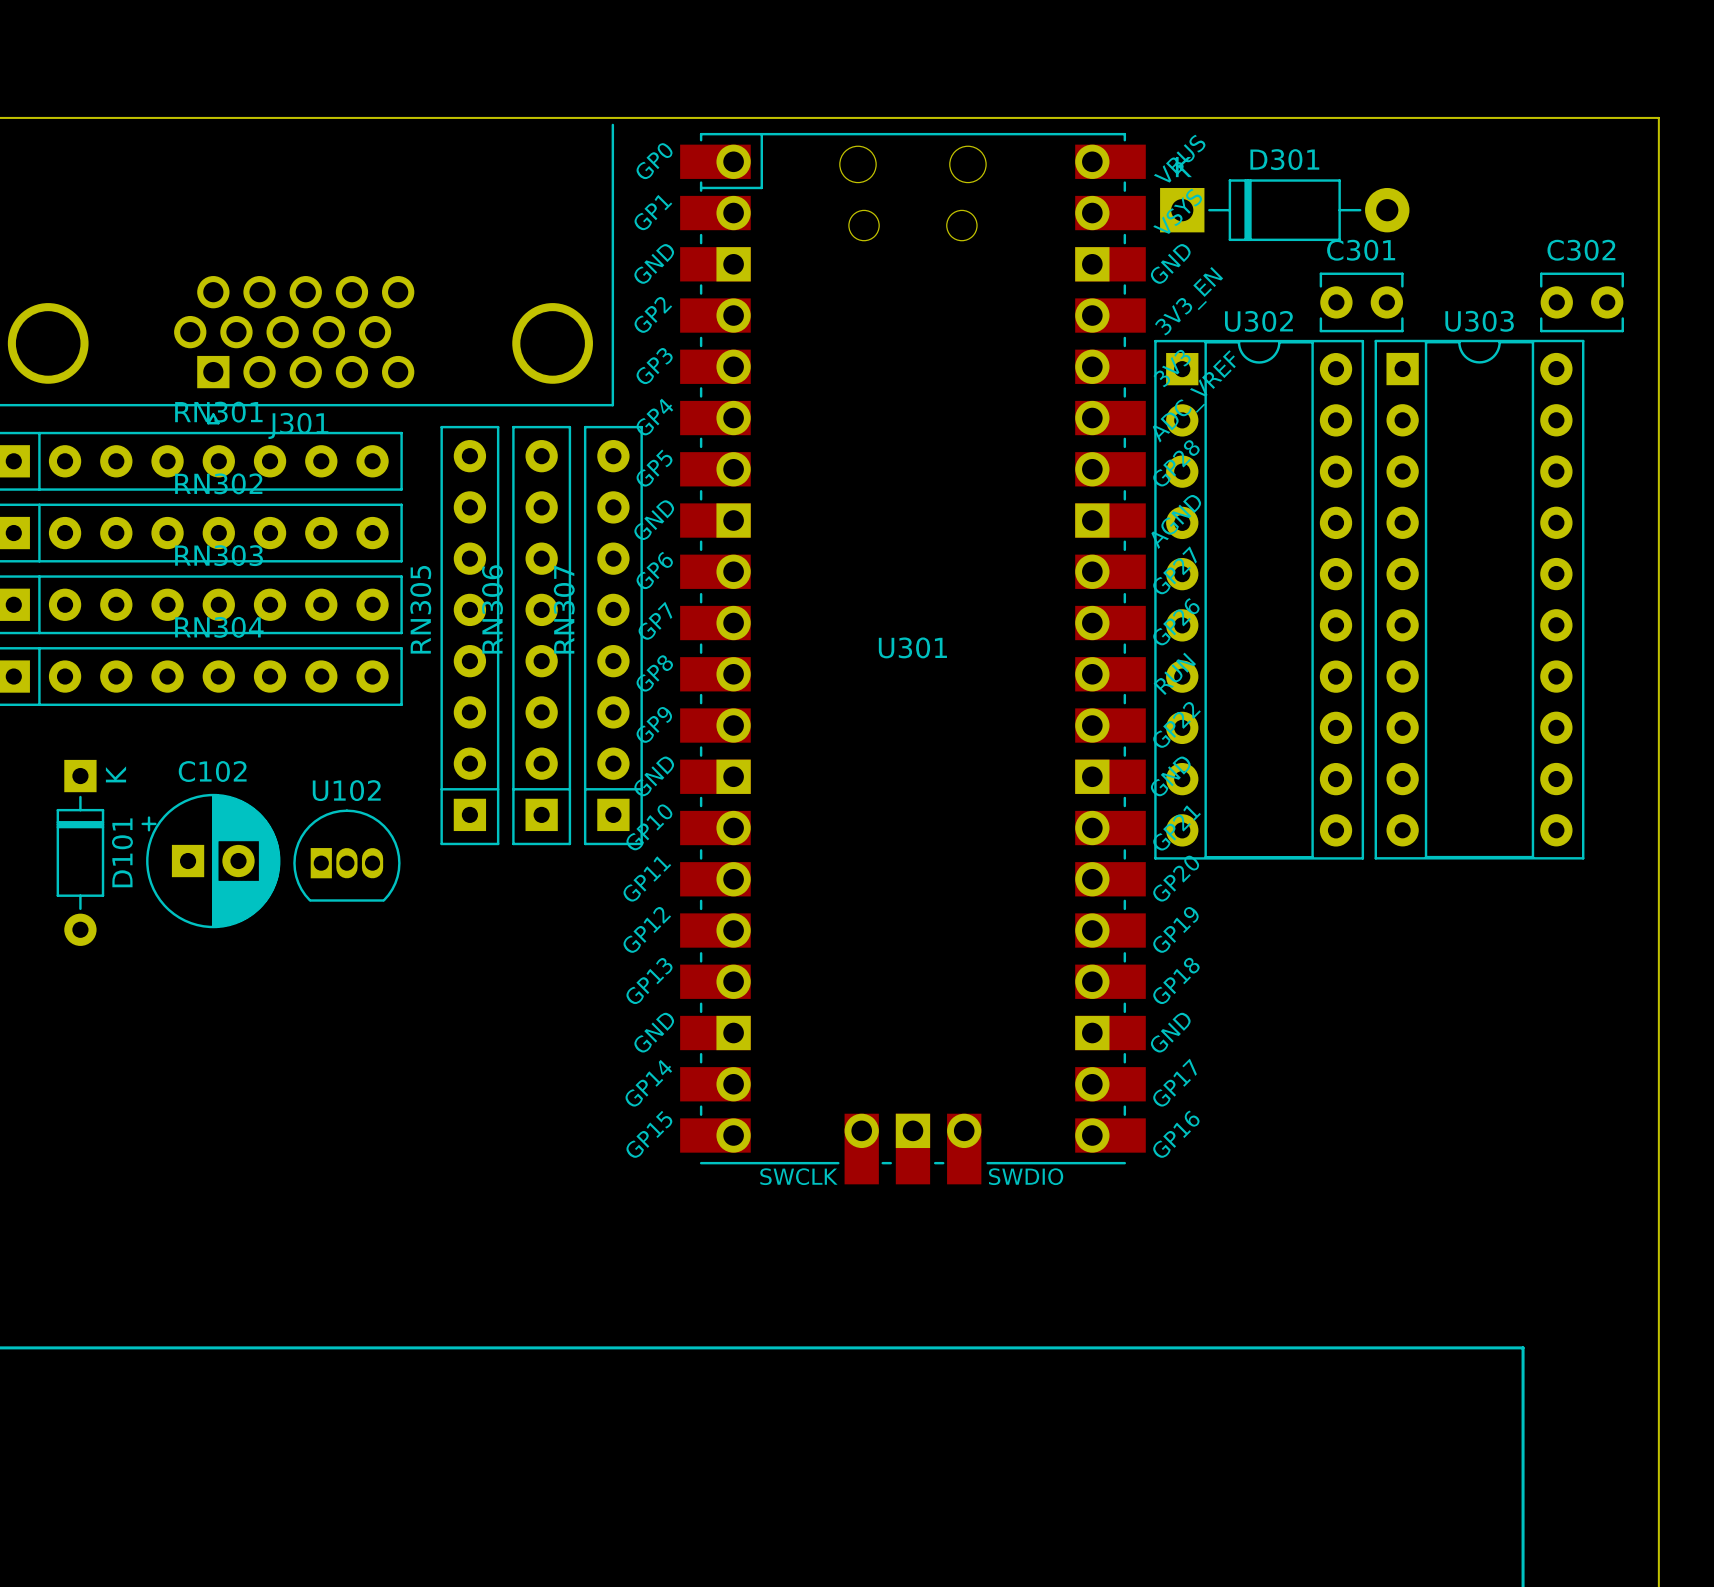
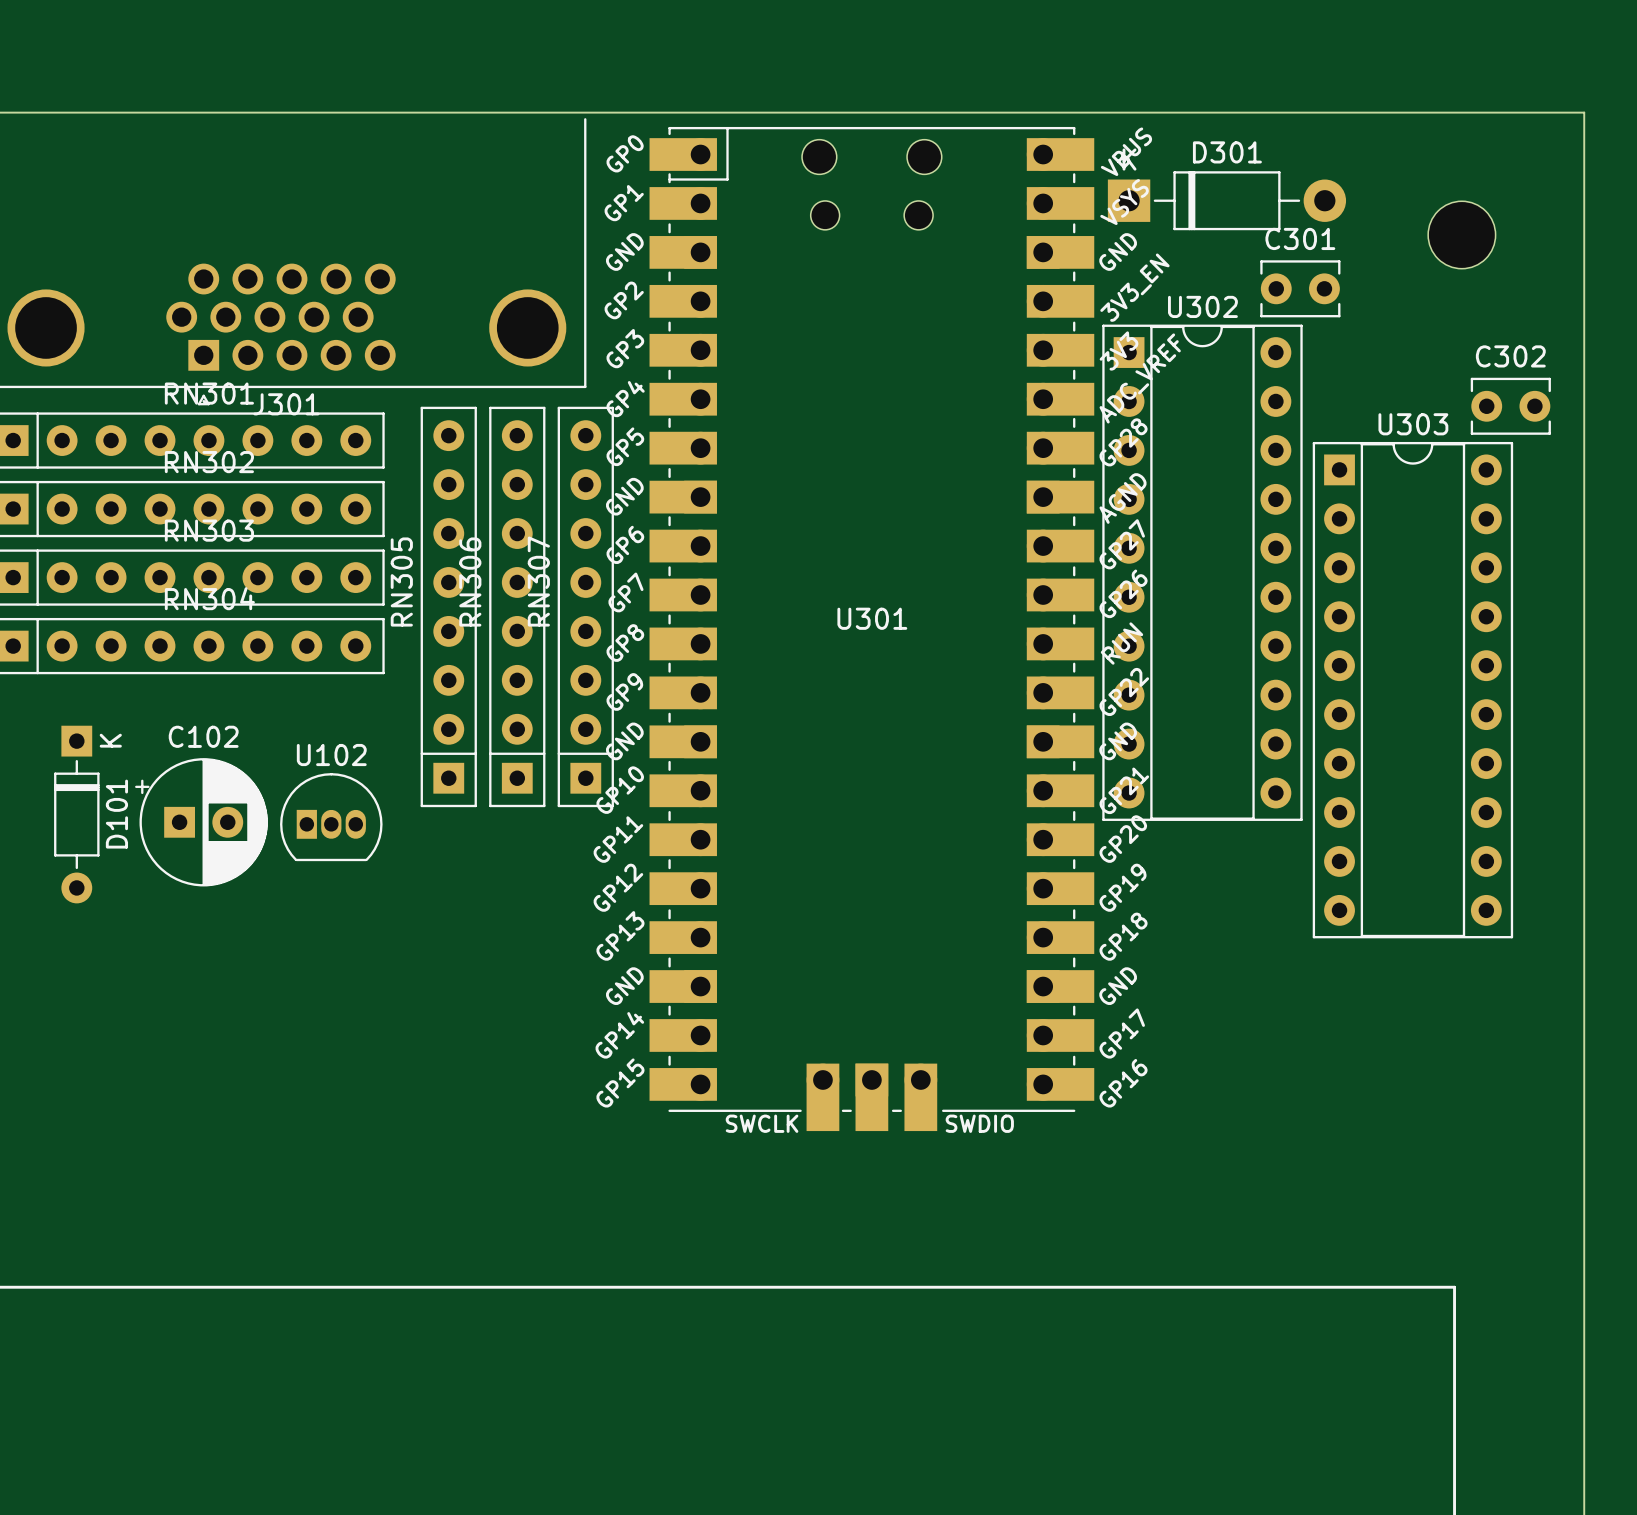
part: none -> (1461, 234)
C302 position: (1581, 302) -> (1510, 406)
U303 position: (1479, 599) -> (1412, 690)

